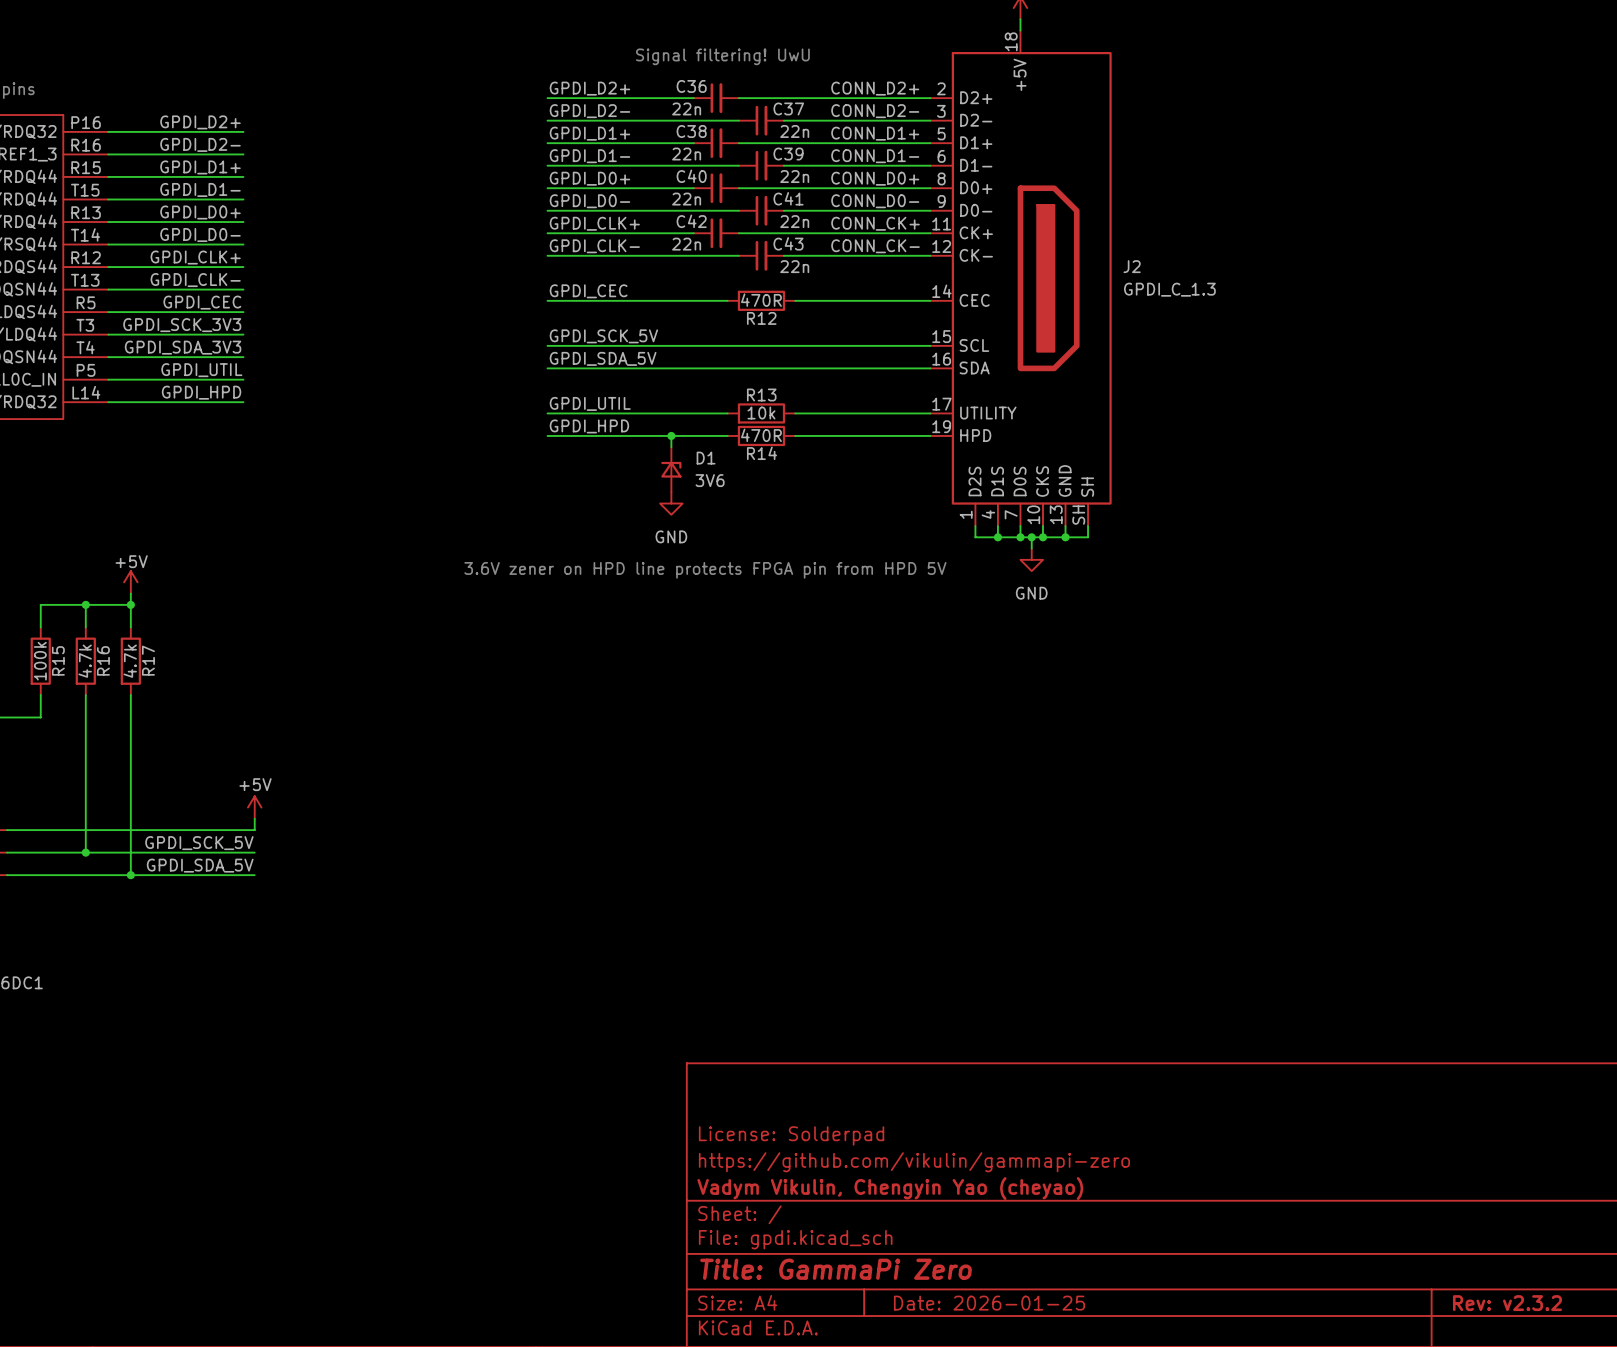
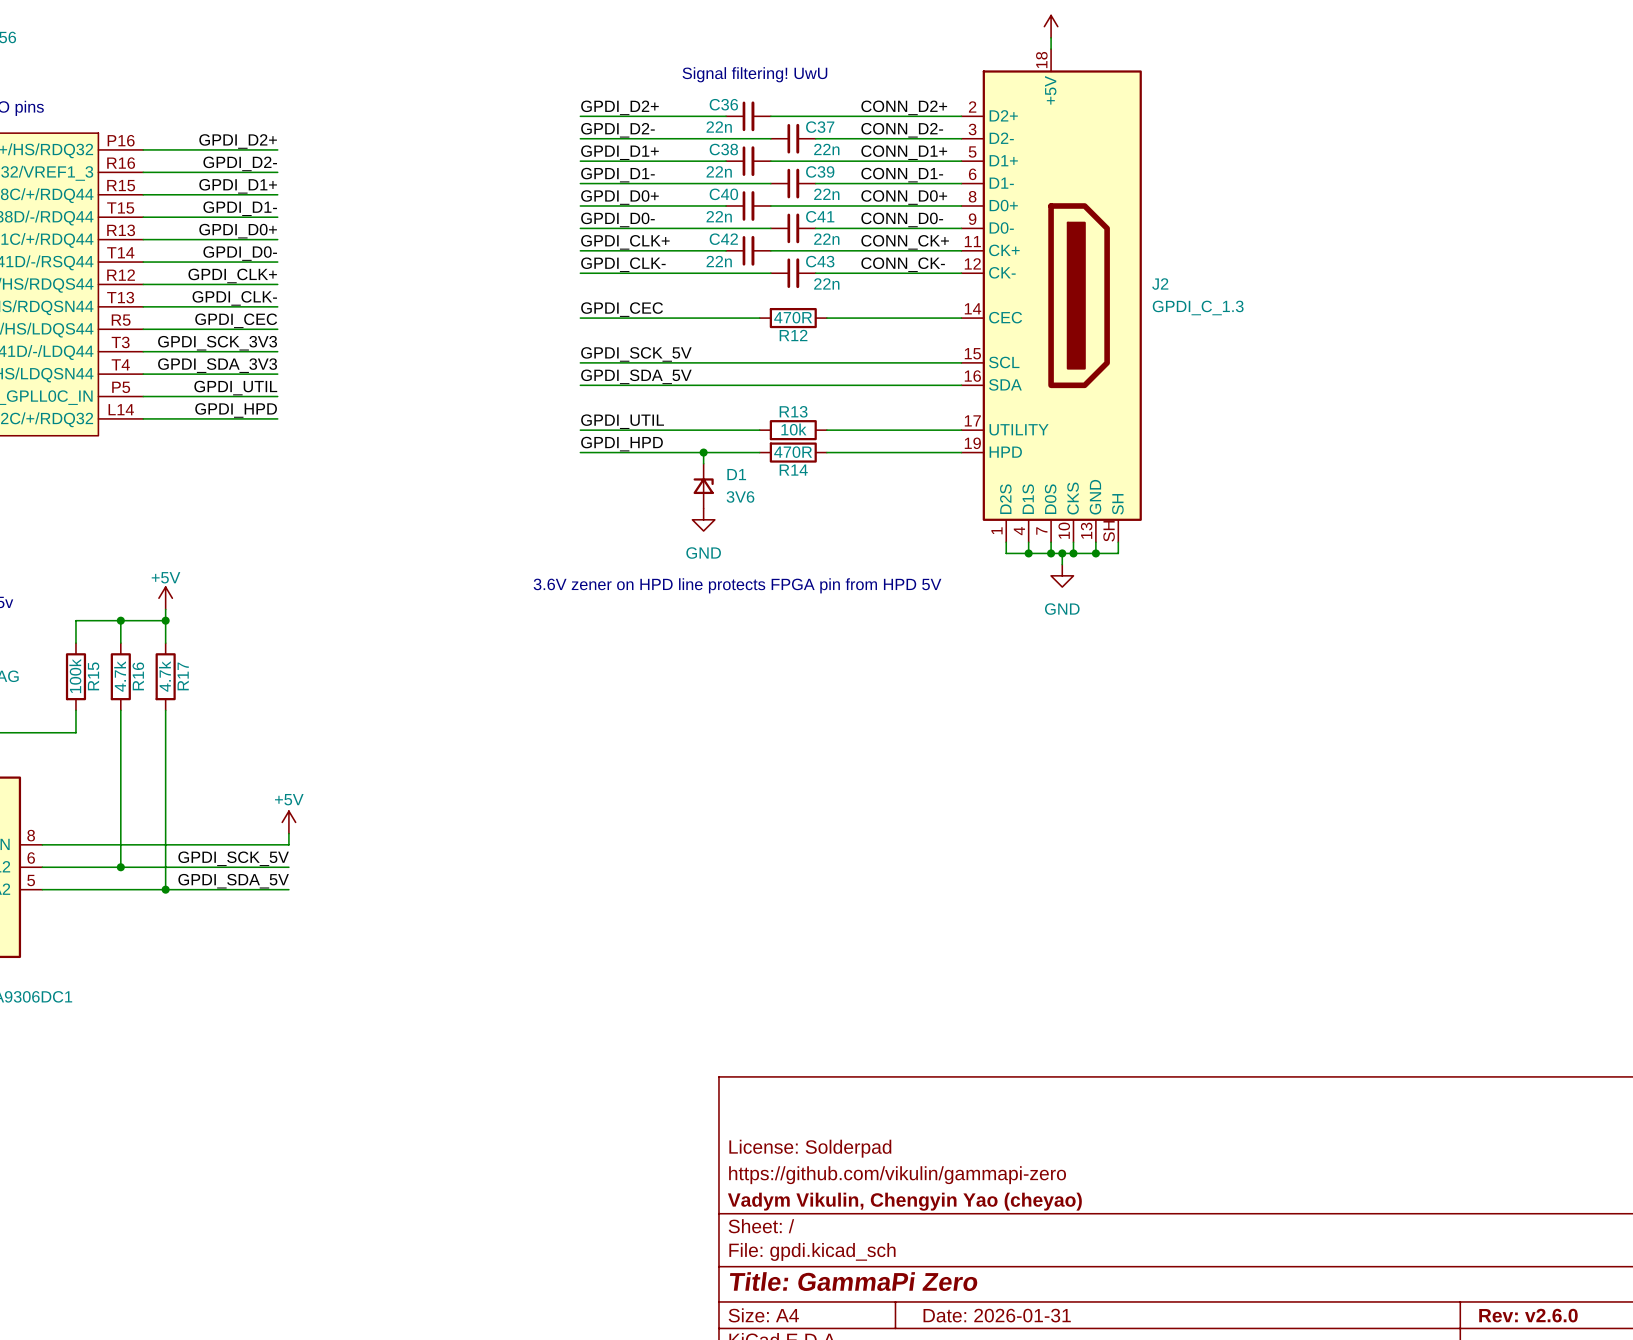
title block: Date: 2026-01-25 (989, 1303) -> Date: 2026-01-31 (997, 1315)
title block: Rev: v2.3.2 (1507, 1303) -> Rev: v2.6.0 (1528, 1315)

